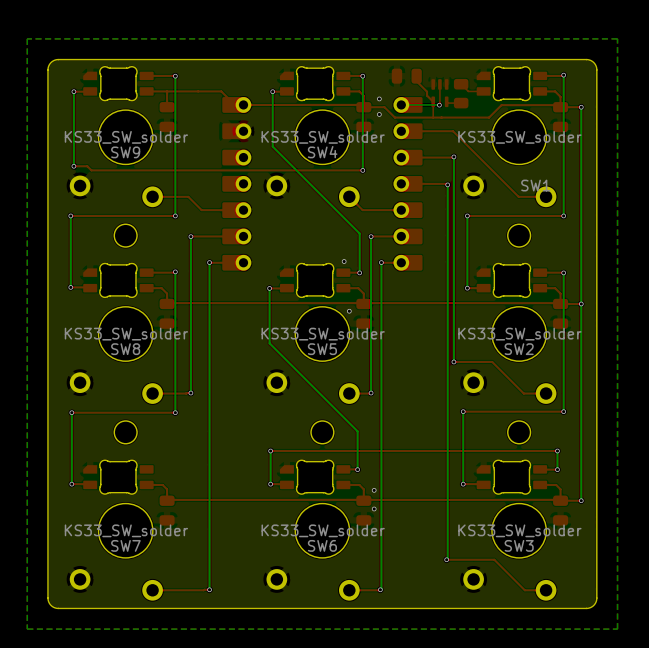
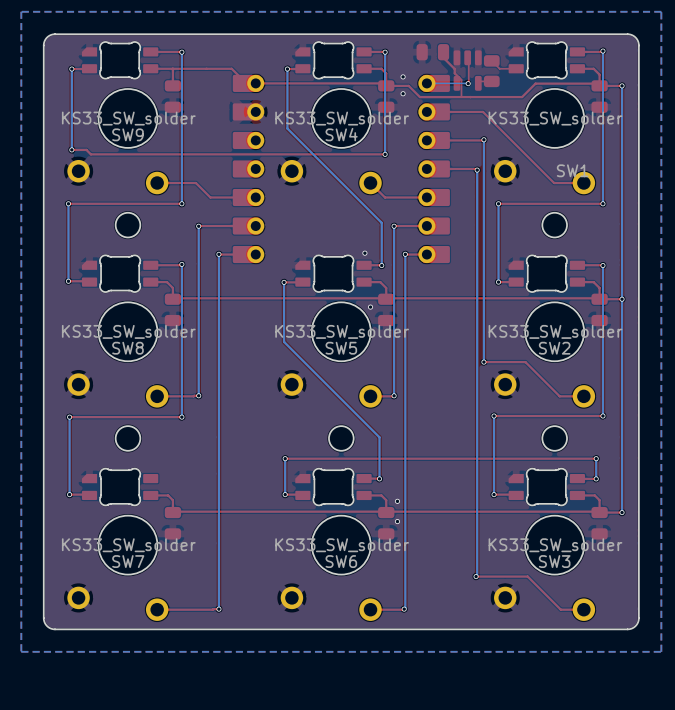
part footprint: [431, 79, 449, 108] -> [453, 50, 482, 91]

